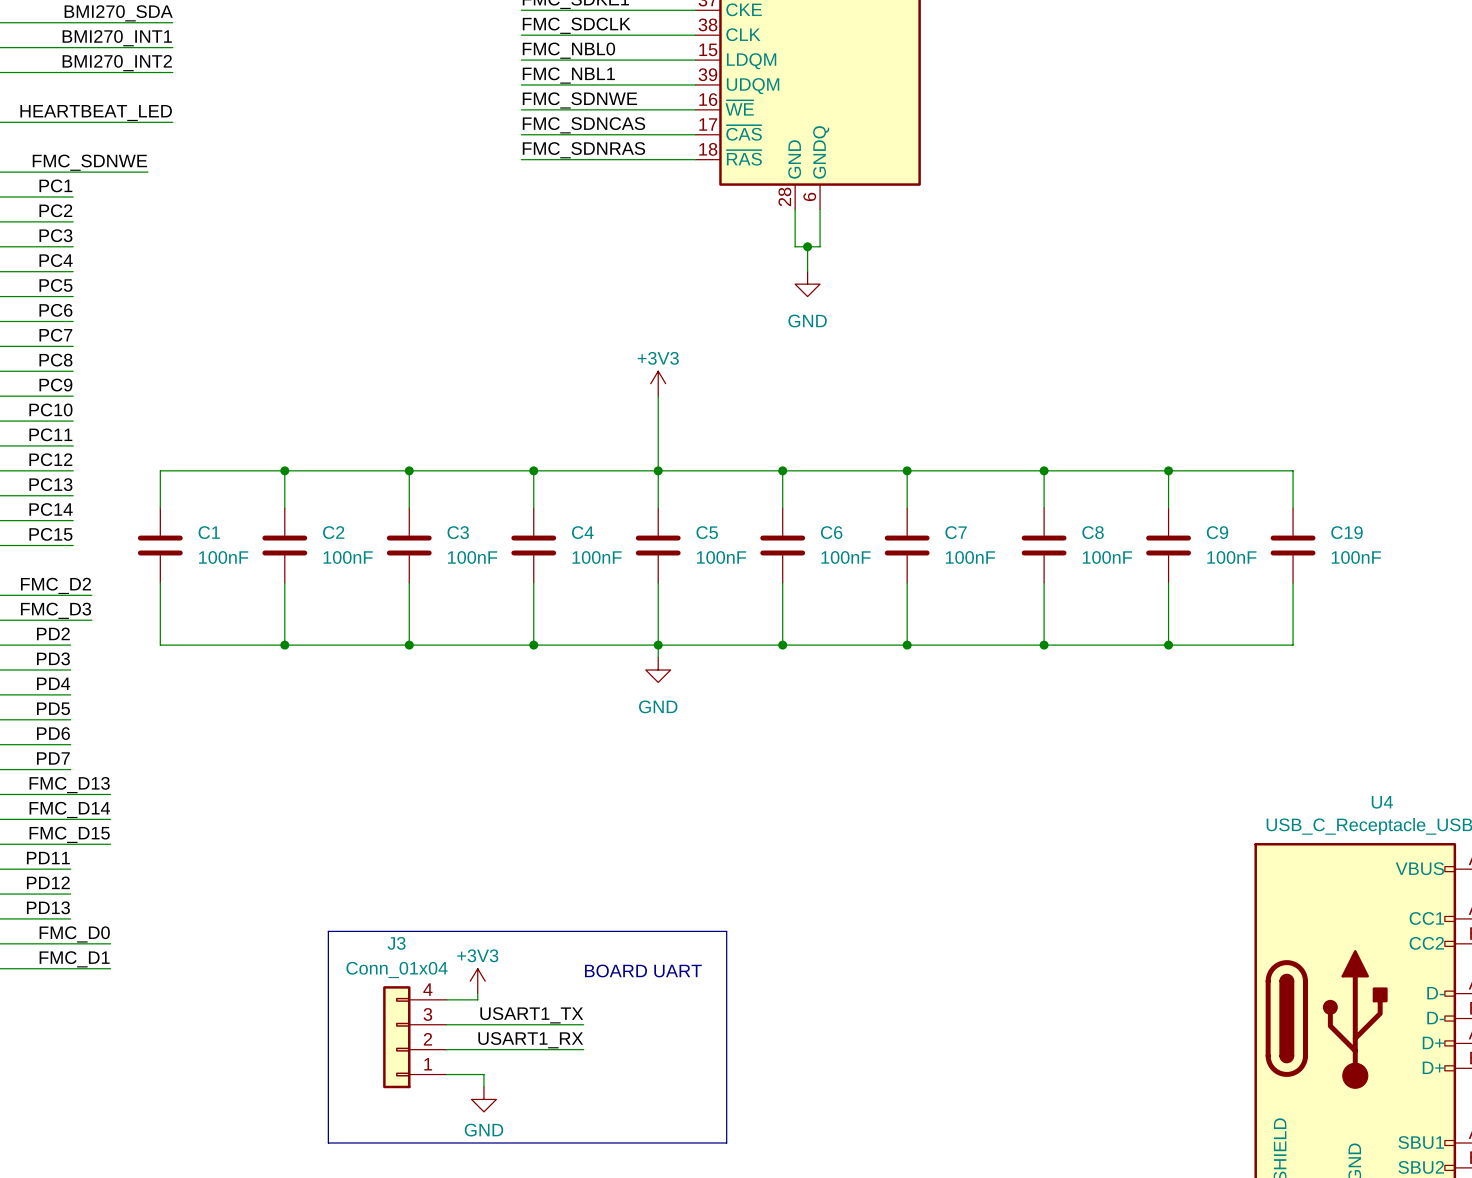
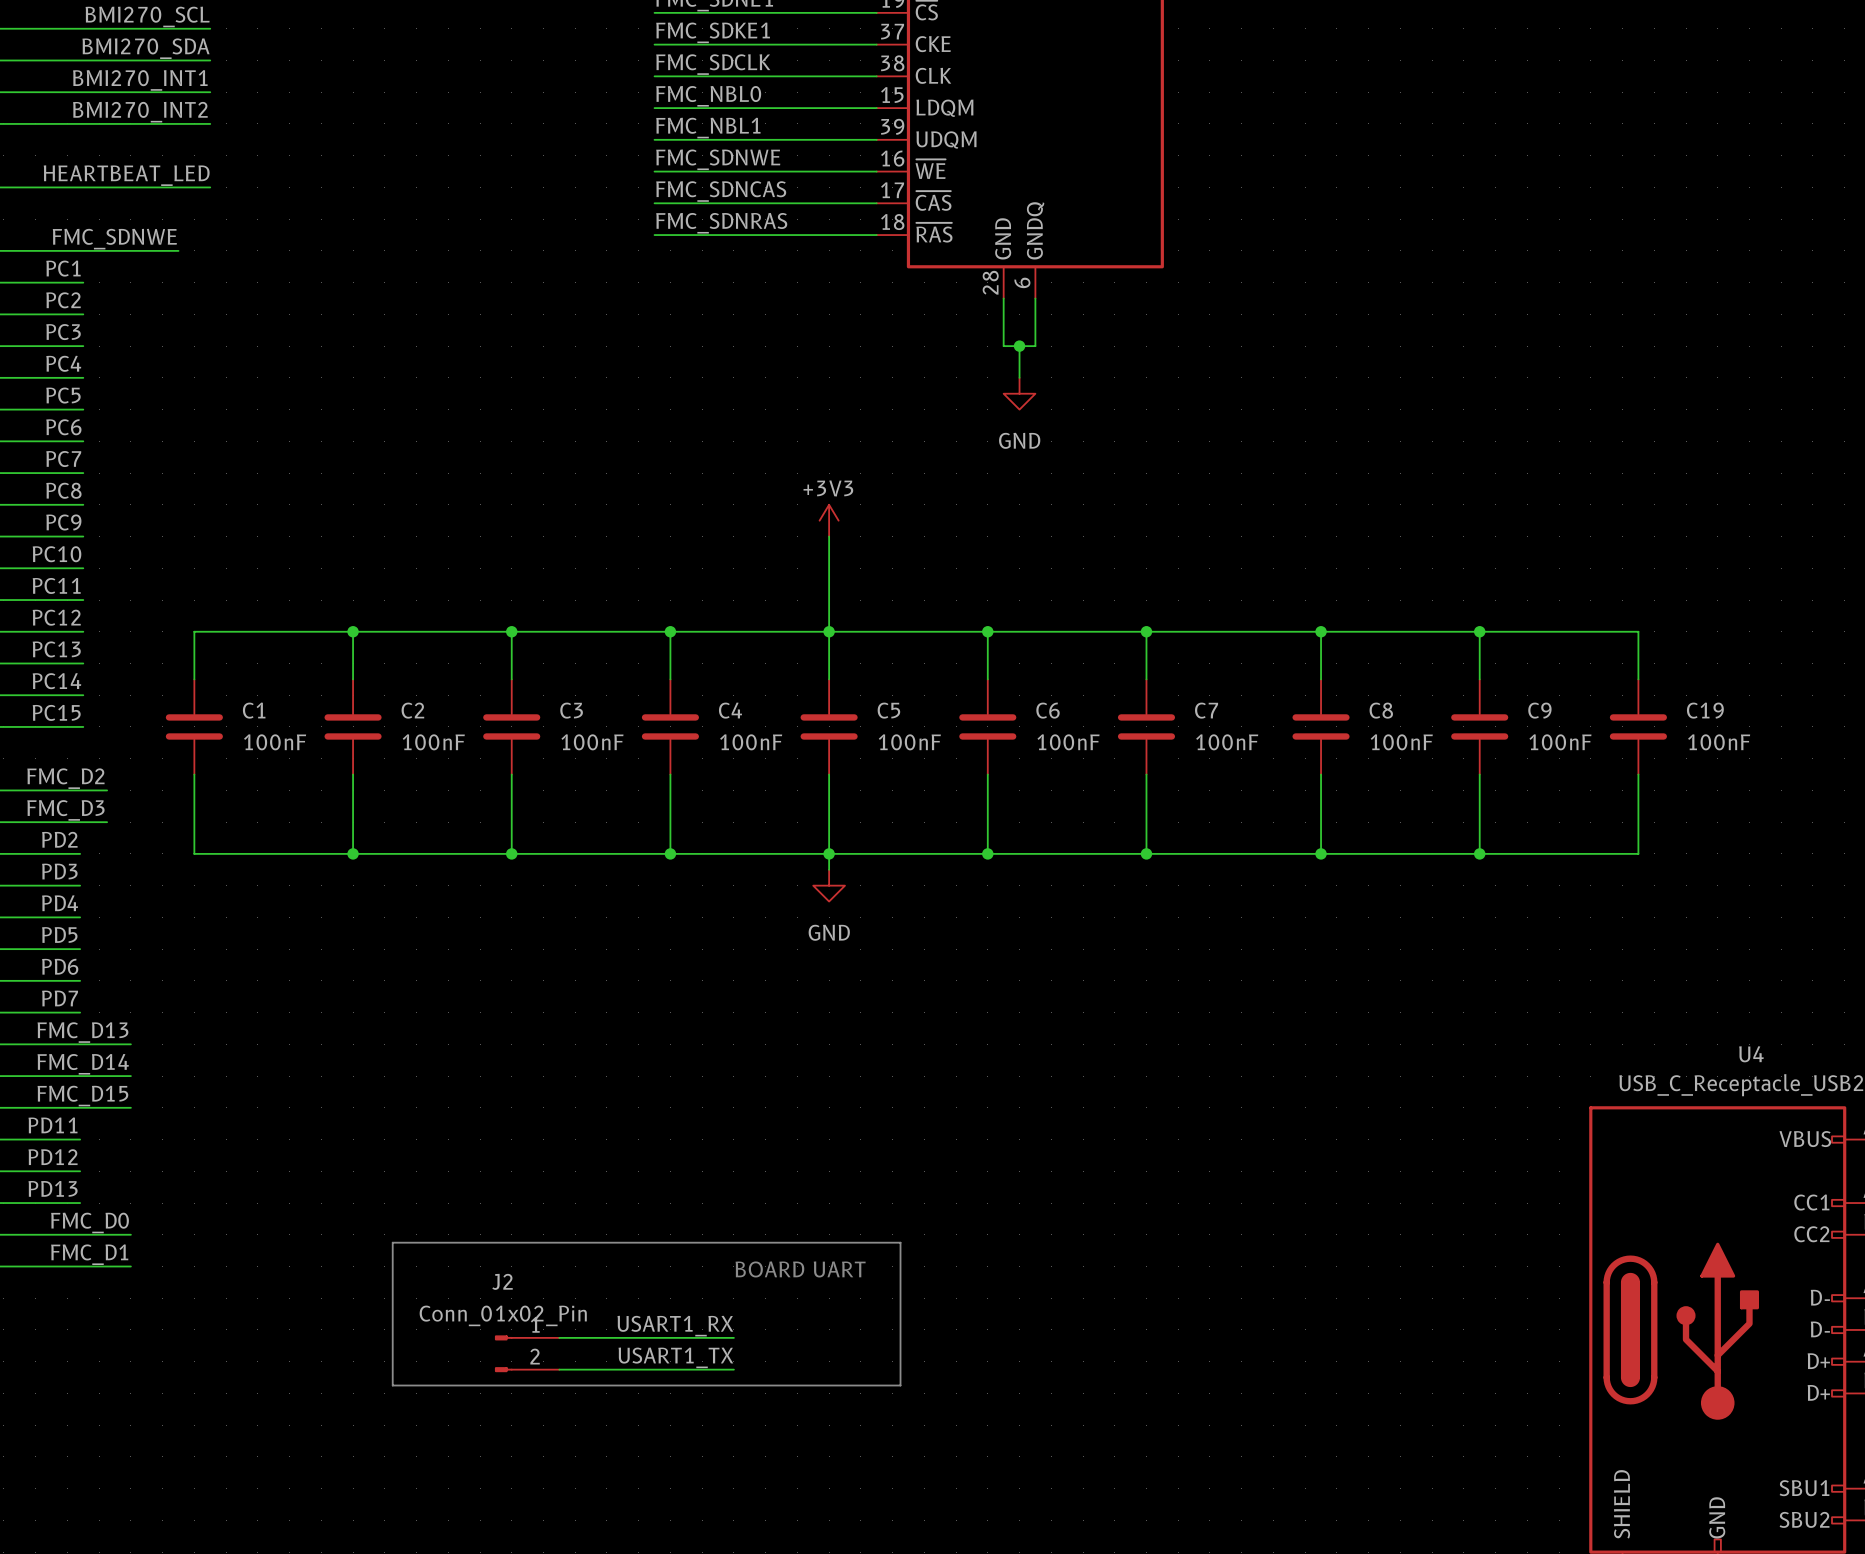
line: (328, 931) (726, 931) (726, 1143) (328, 1143) (328, 931) -> (392, 1242) (392, 1385) (900, 1385) (900, 1242) (392, 1242)
power symbol: +3V3 (477, 981) -> none
wire: (477, 993) (477, 999) (446, 999) -> none
label: USART1_TX (531, 1015) -> USART1_RX (675, 1326)
J3: Conn_01x04 (414, 1037) -> none
J2: none -> Conn_01x02_Pin (527, 1353)
label: USART1_RX (530, 1040) -> USART1_TX (675, 1357)
wire: (446, 1074) (483, 1074) (483, 1086) -> none
power symbol: GND (483, 1099) -> none

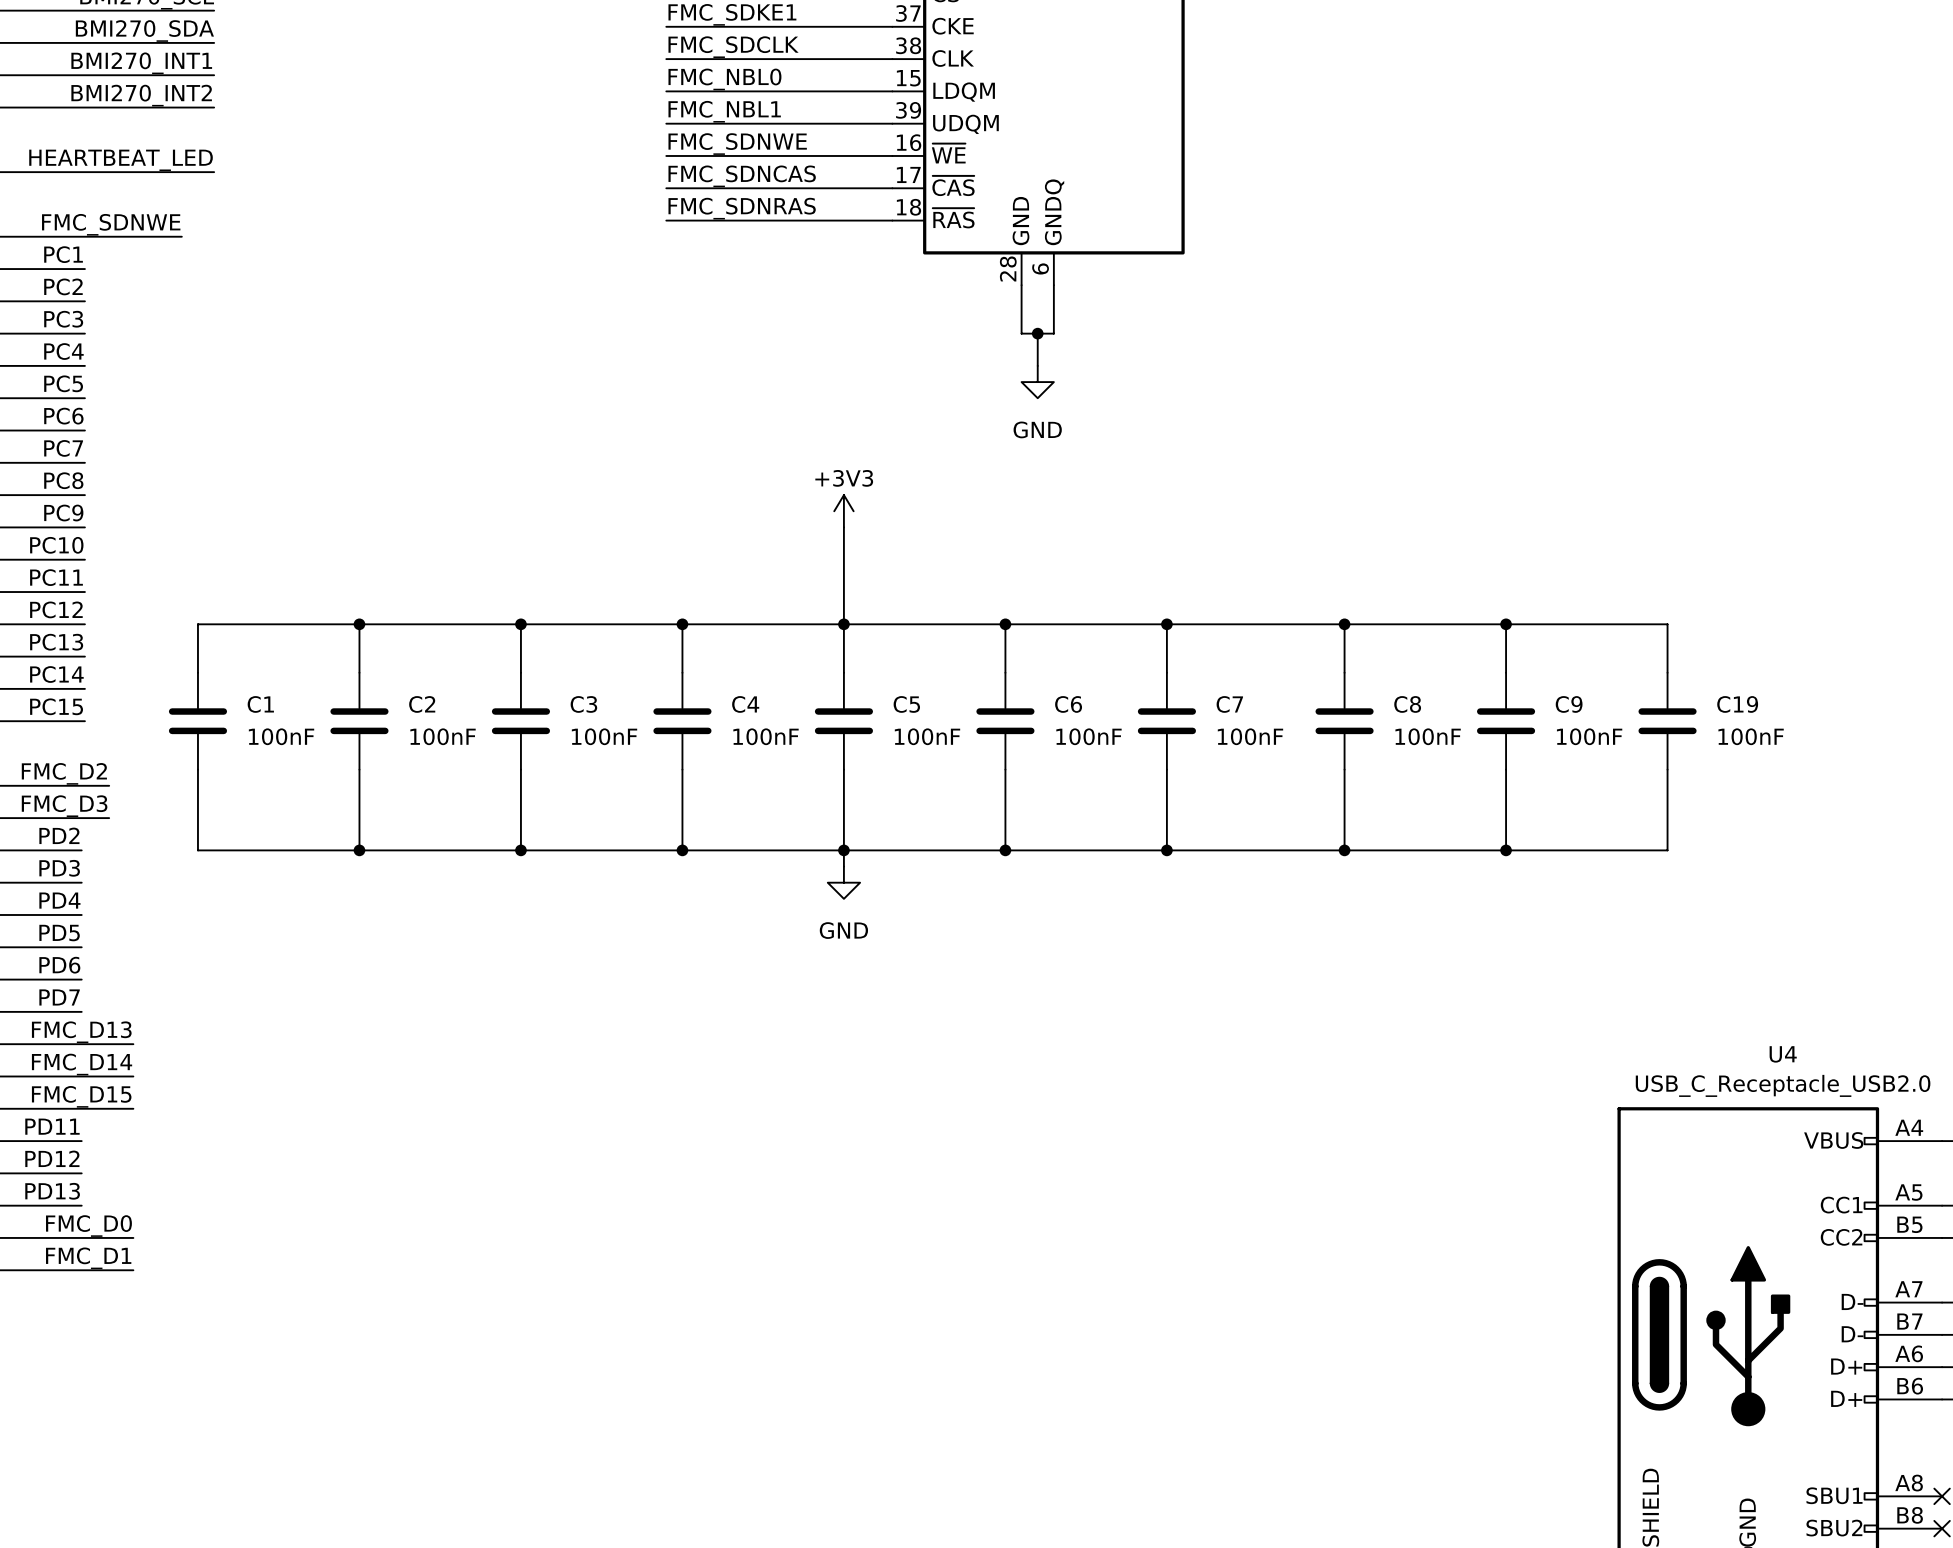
line: (392, 1242) (900, 1242) (900, 1385) (392, 1385) (392, 1242) -> none
text: BOARD UART (800, 1269) -> none
label: USART1_RX (675, 1326) -> none
wire: (559, 1337) (733, 1337) -> none
J2: Conn_01x02_Pin (527, 1353) -> none
label: USART1_TX (675, 1357) -> none
wire: (559, 1369) (733, 1369) -> none

